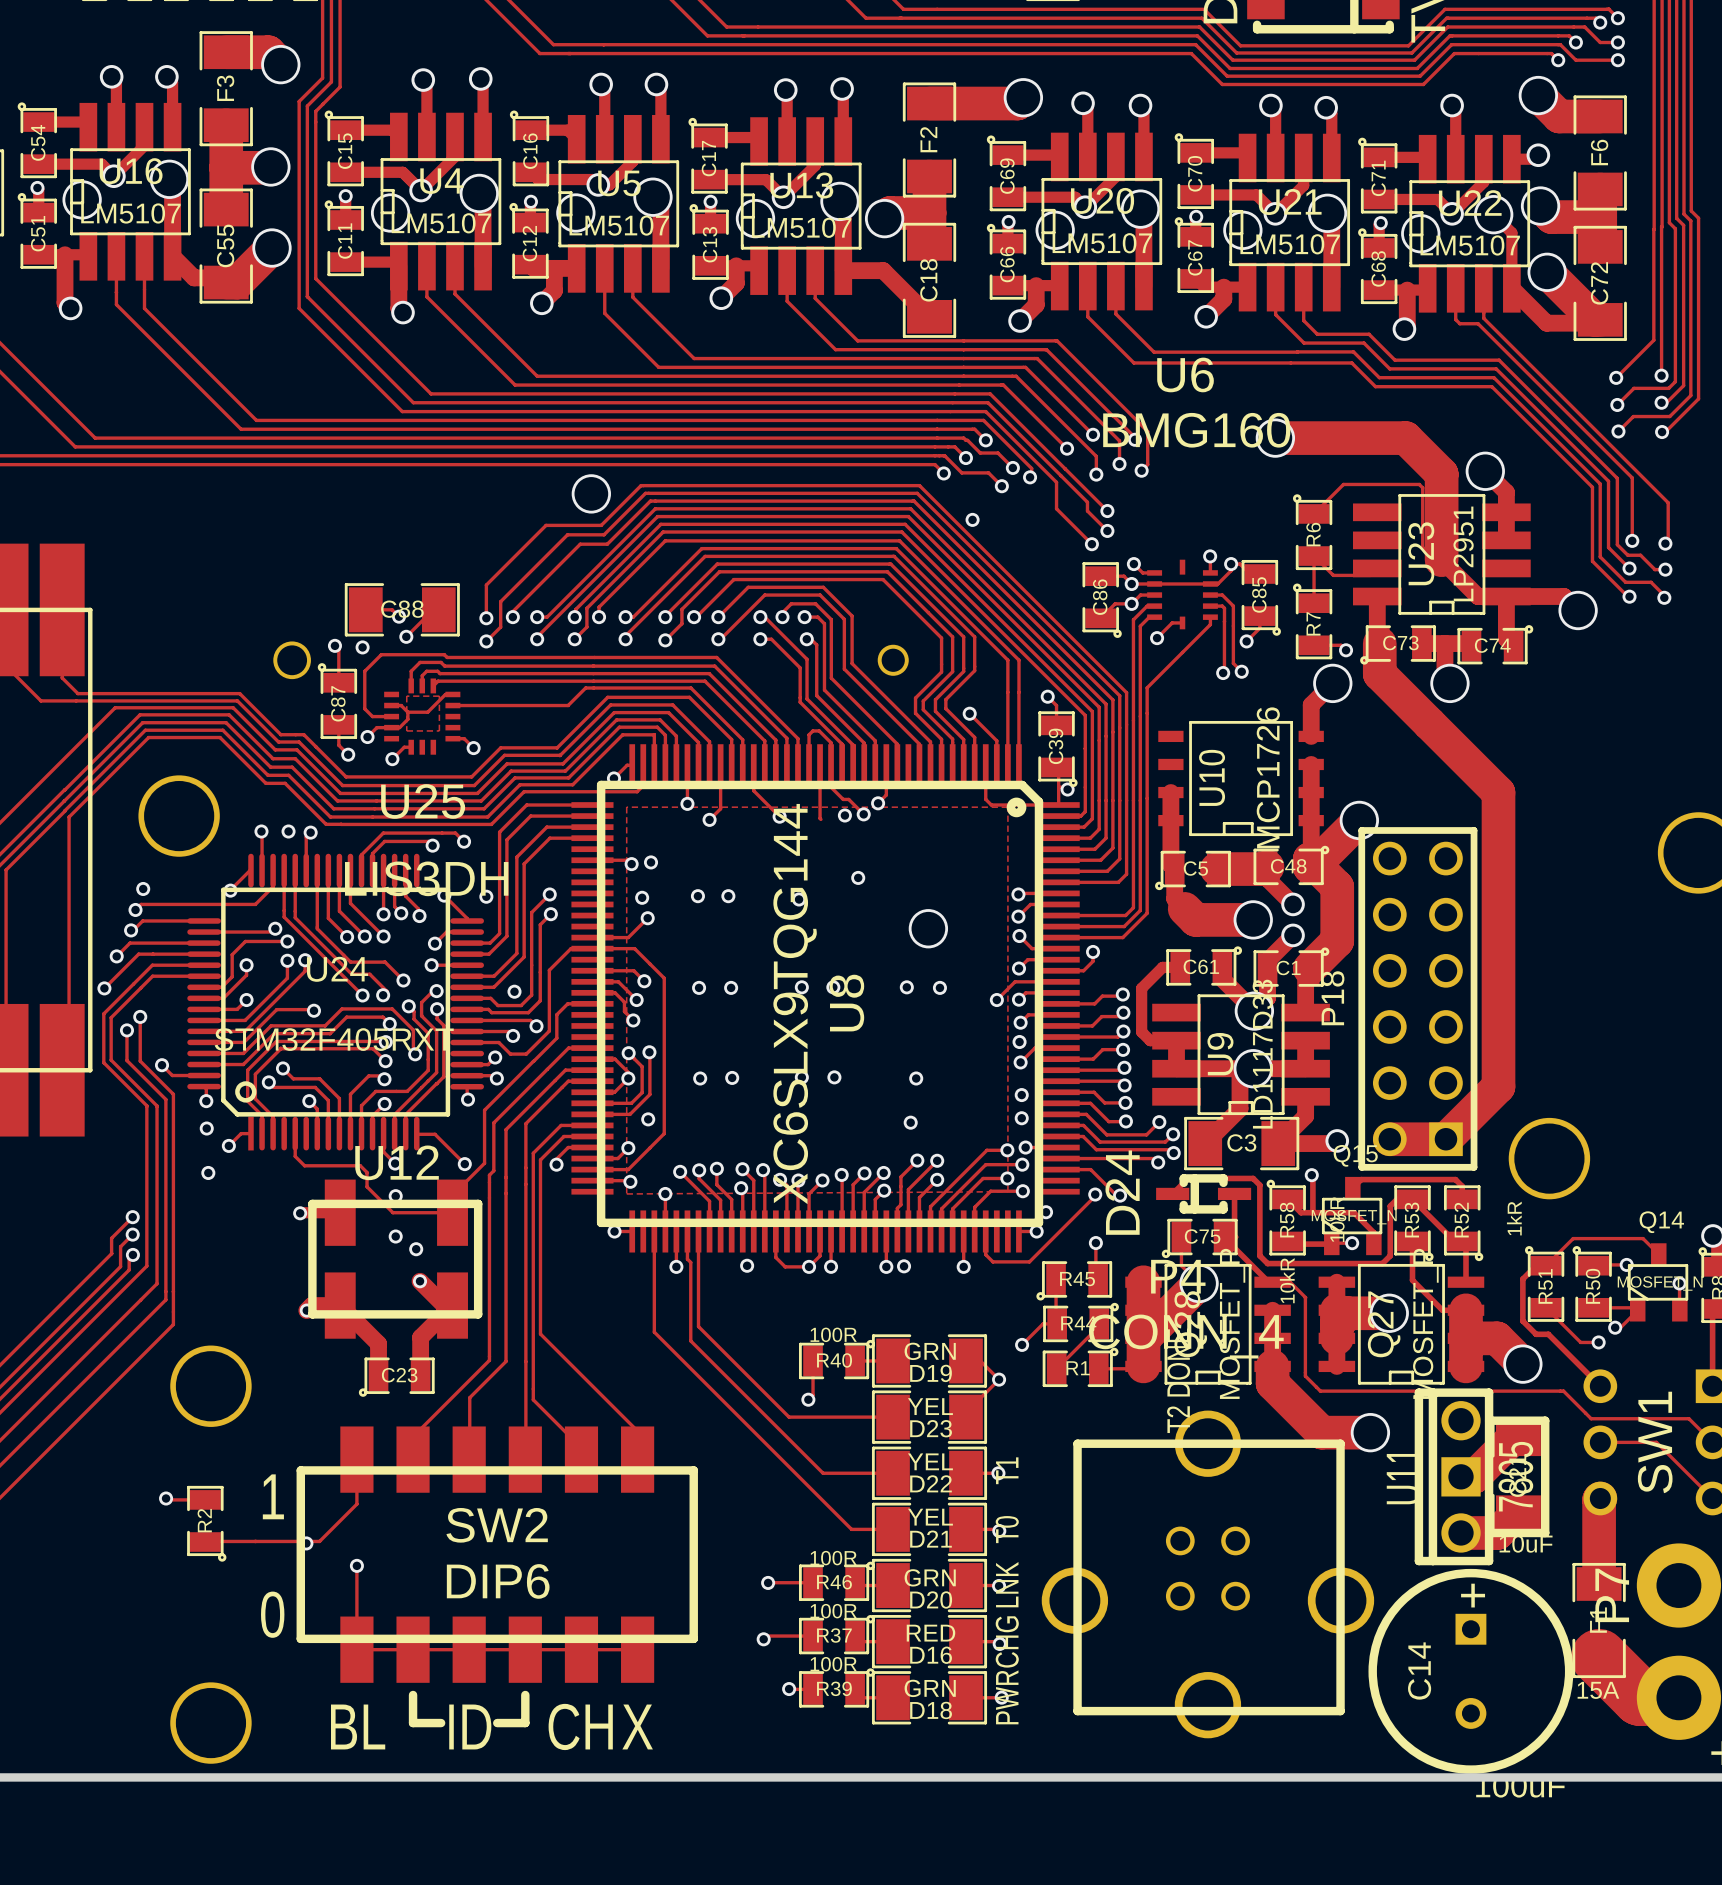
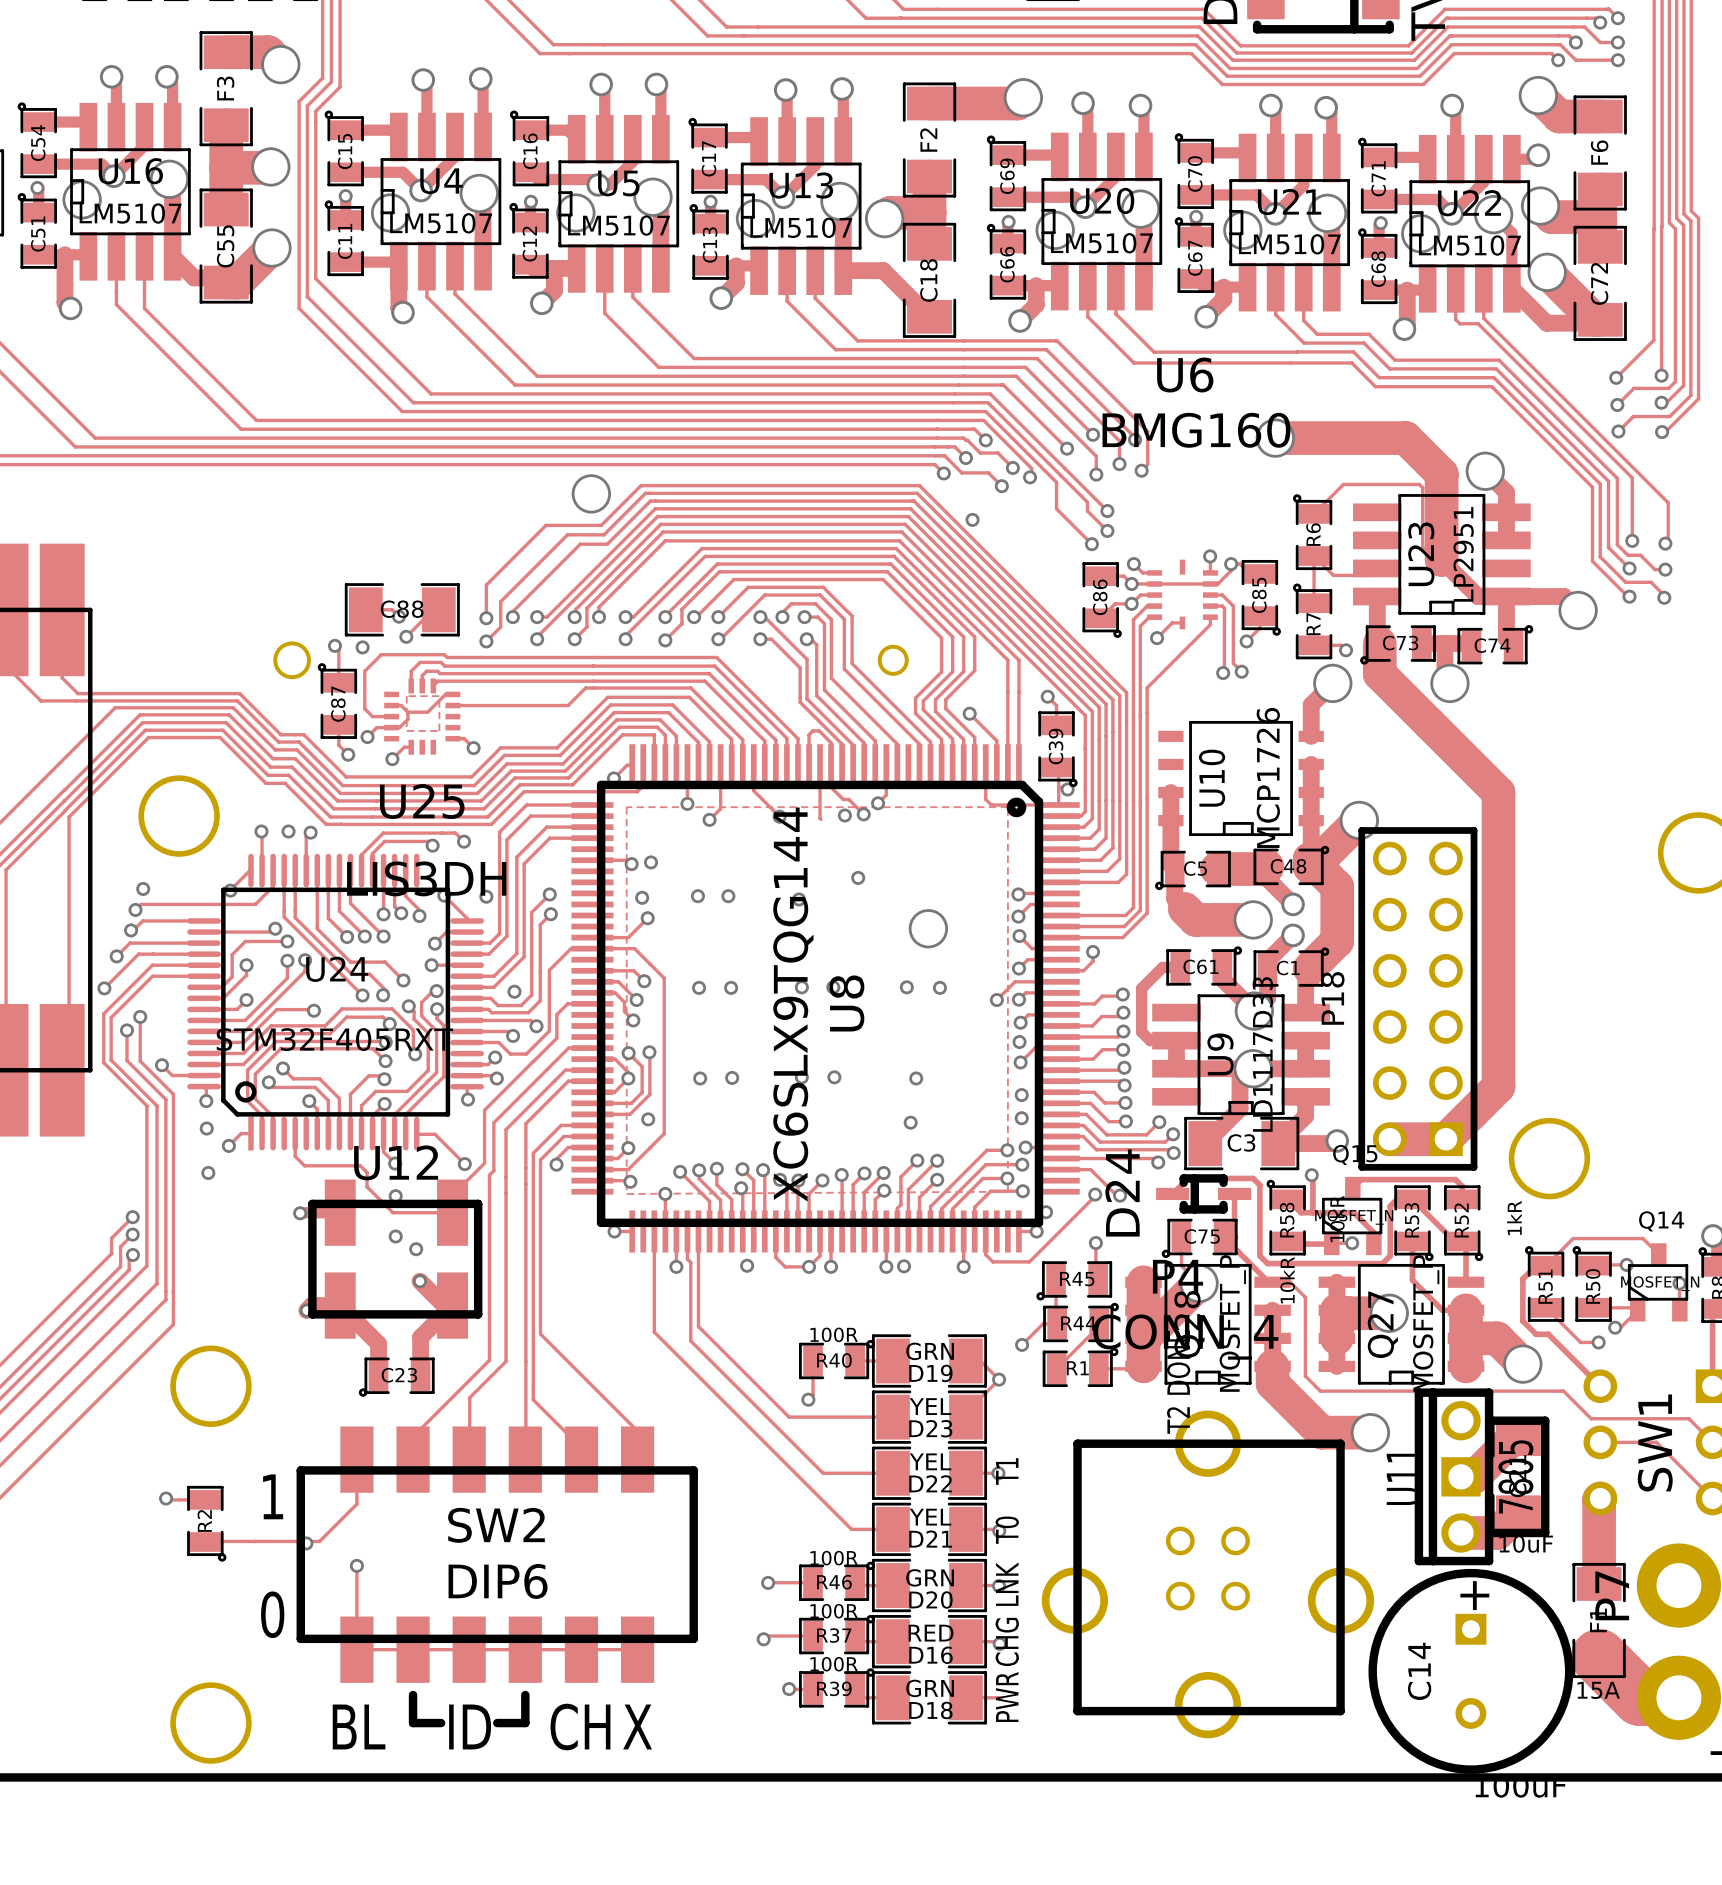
via: (1001, 1697) -> none

